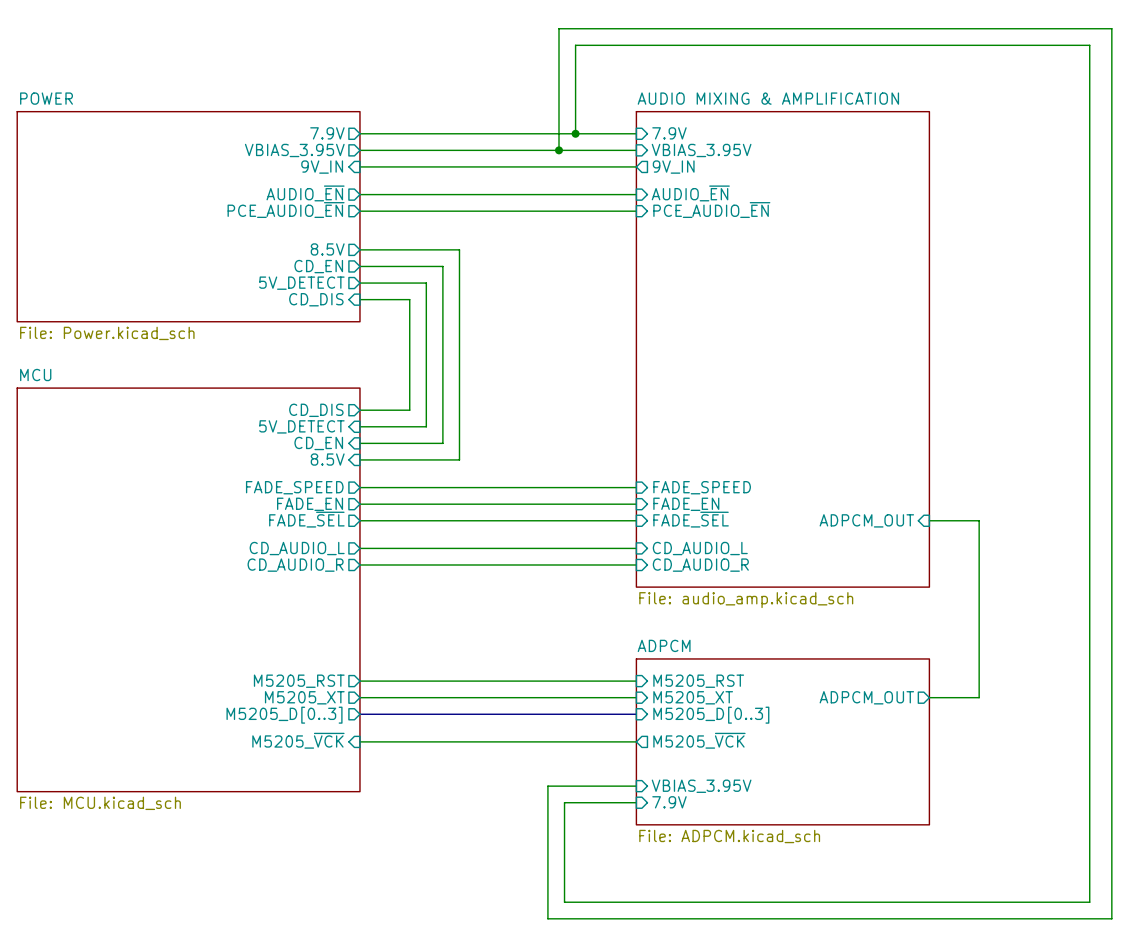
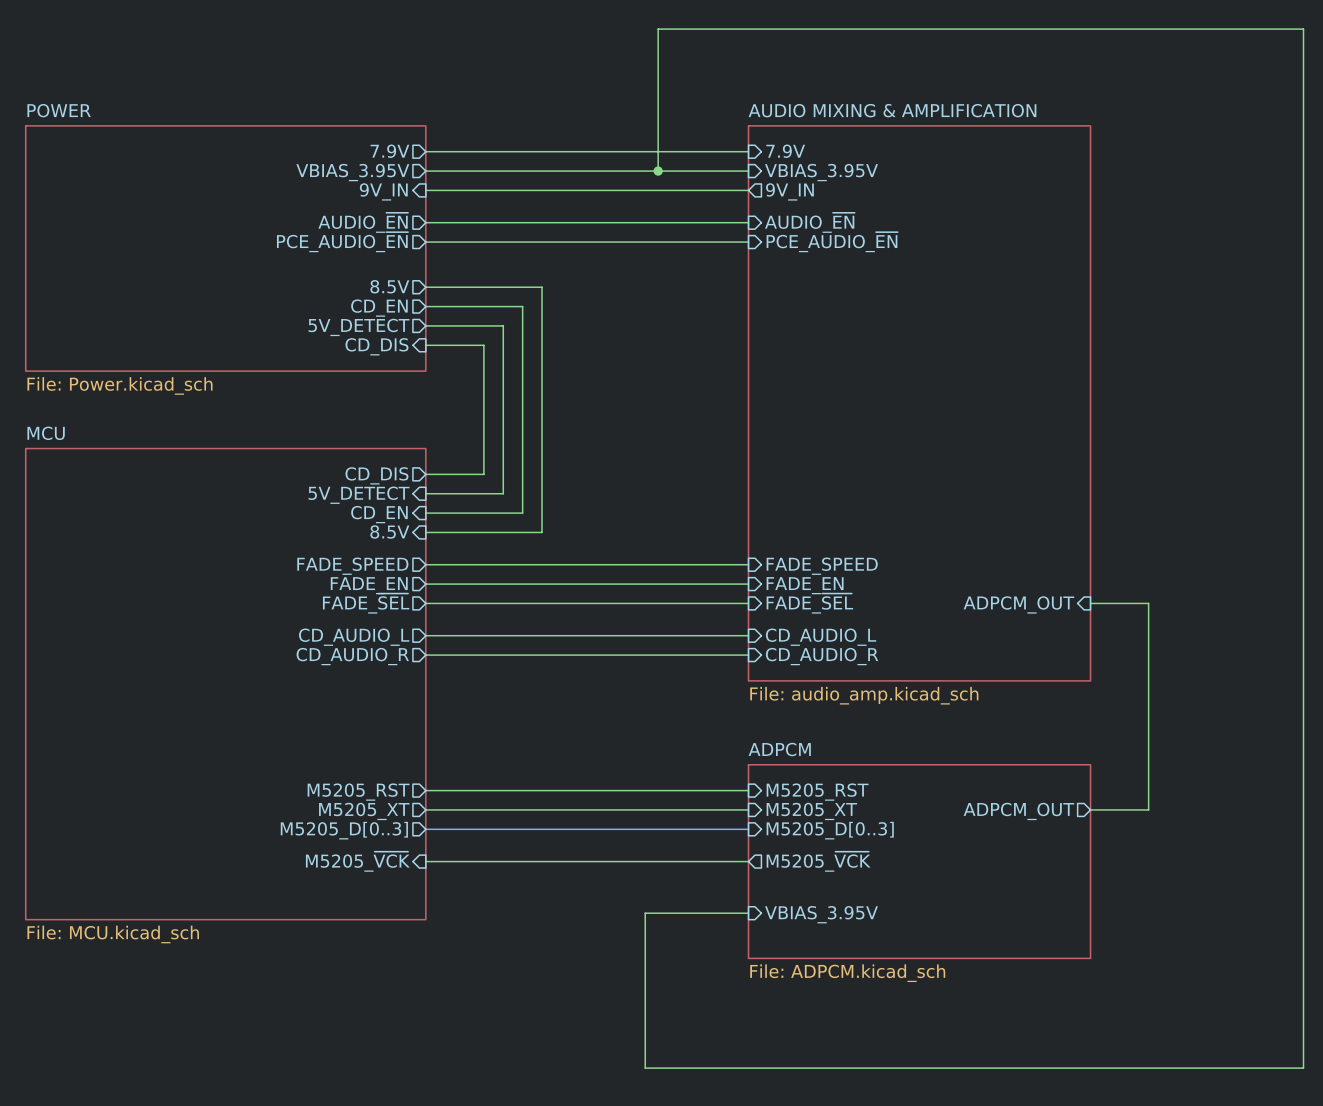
wire: (575, 133) (575, 45) (1089, 45) (1089, 902) (564, 902) (564, 802) (636, 802) -> none
junction: (575, 133) -> none
sheet pin: 7.9V (669, 802) -> none

